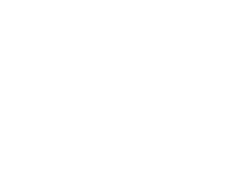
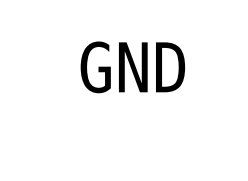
label: none -> GND (132, 67)

